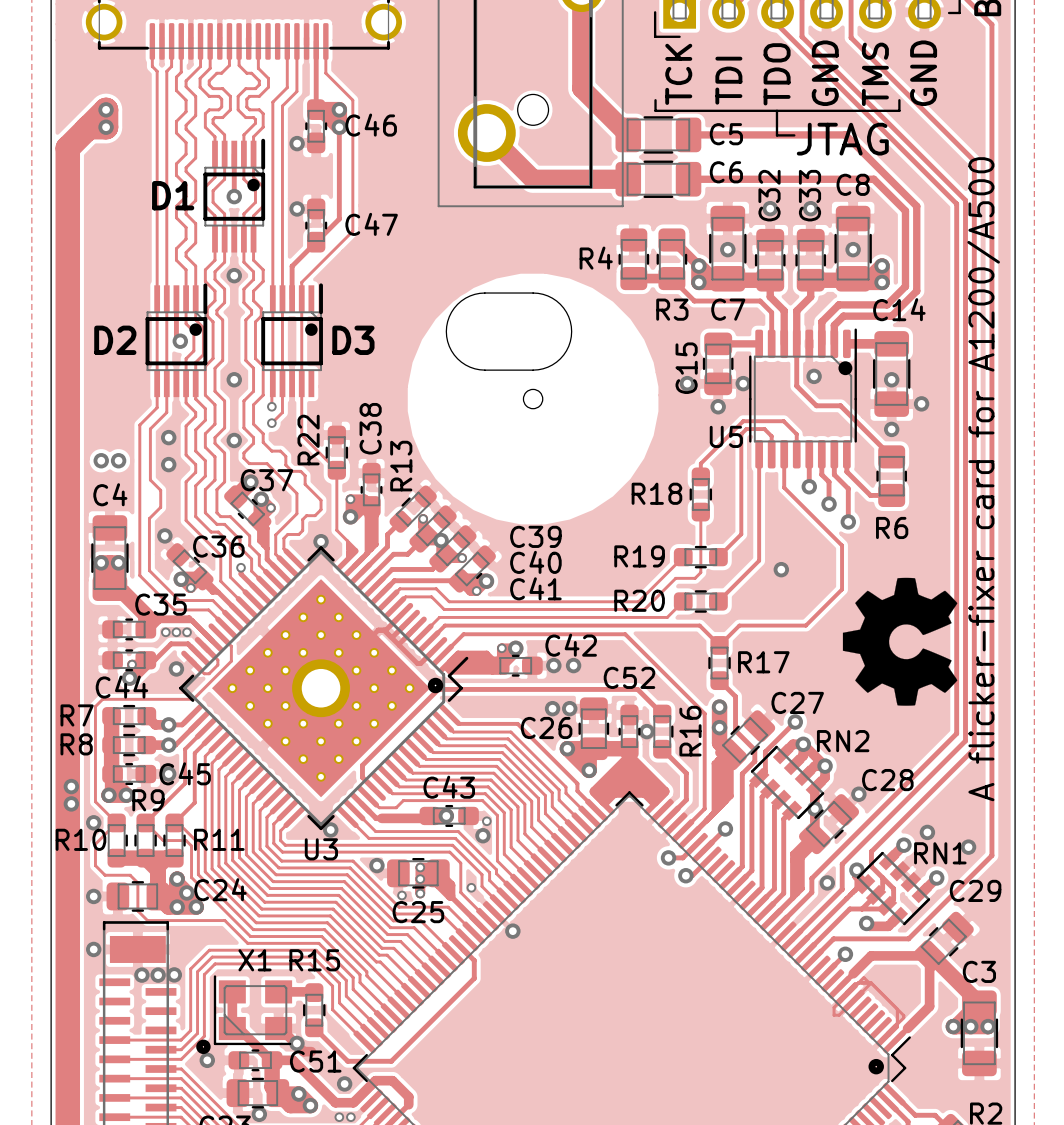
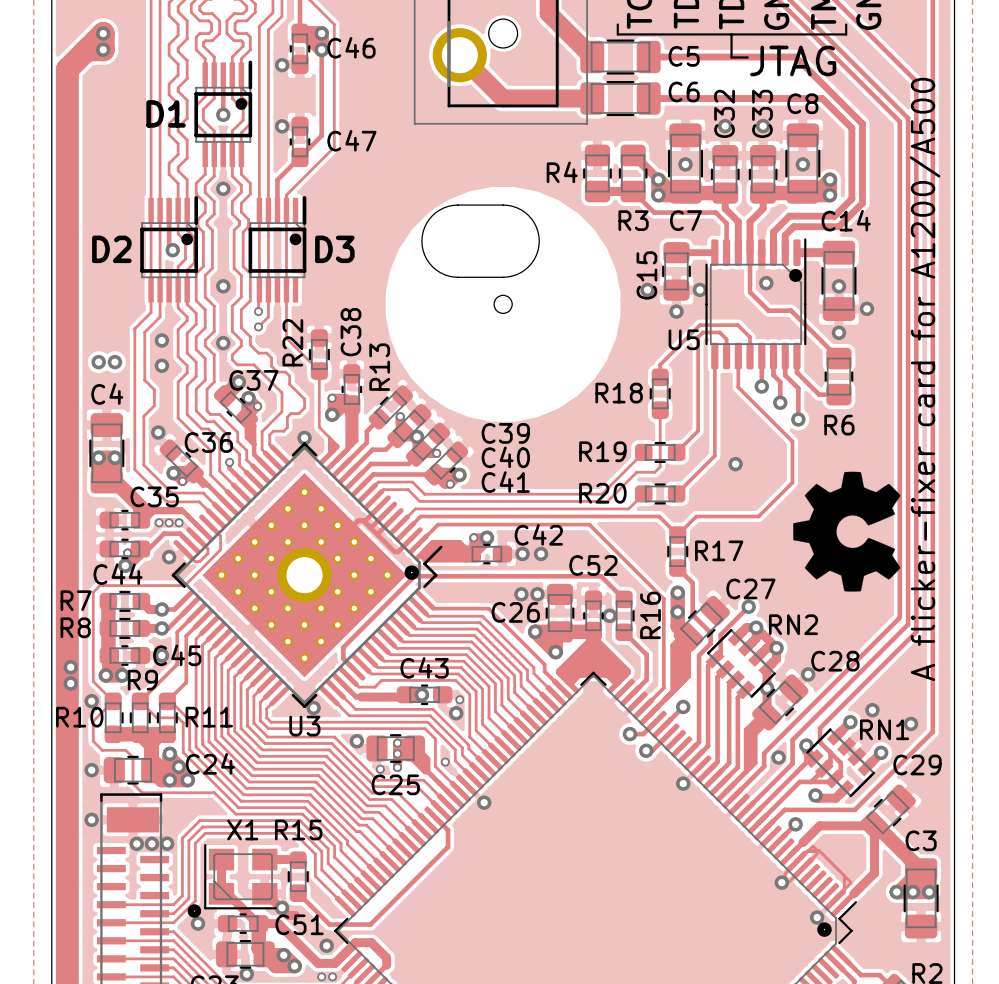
via: none -> (683, 783)
via: none -> (781, 882)
via: none -> (817, 917)

